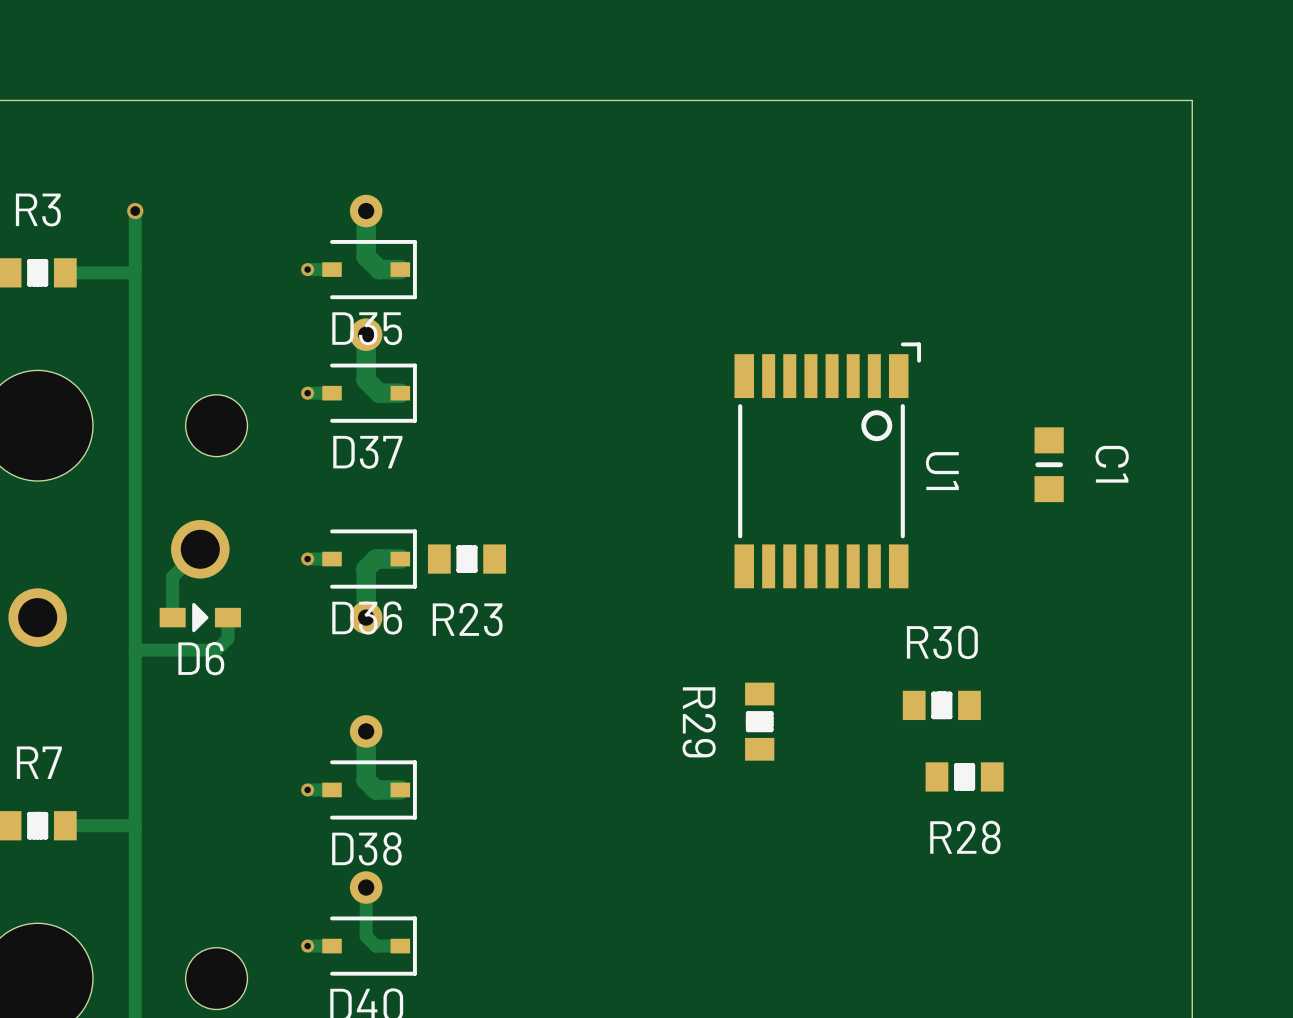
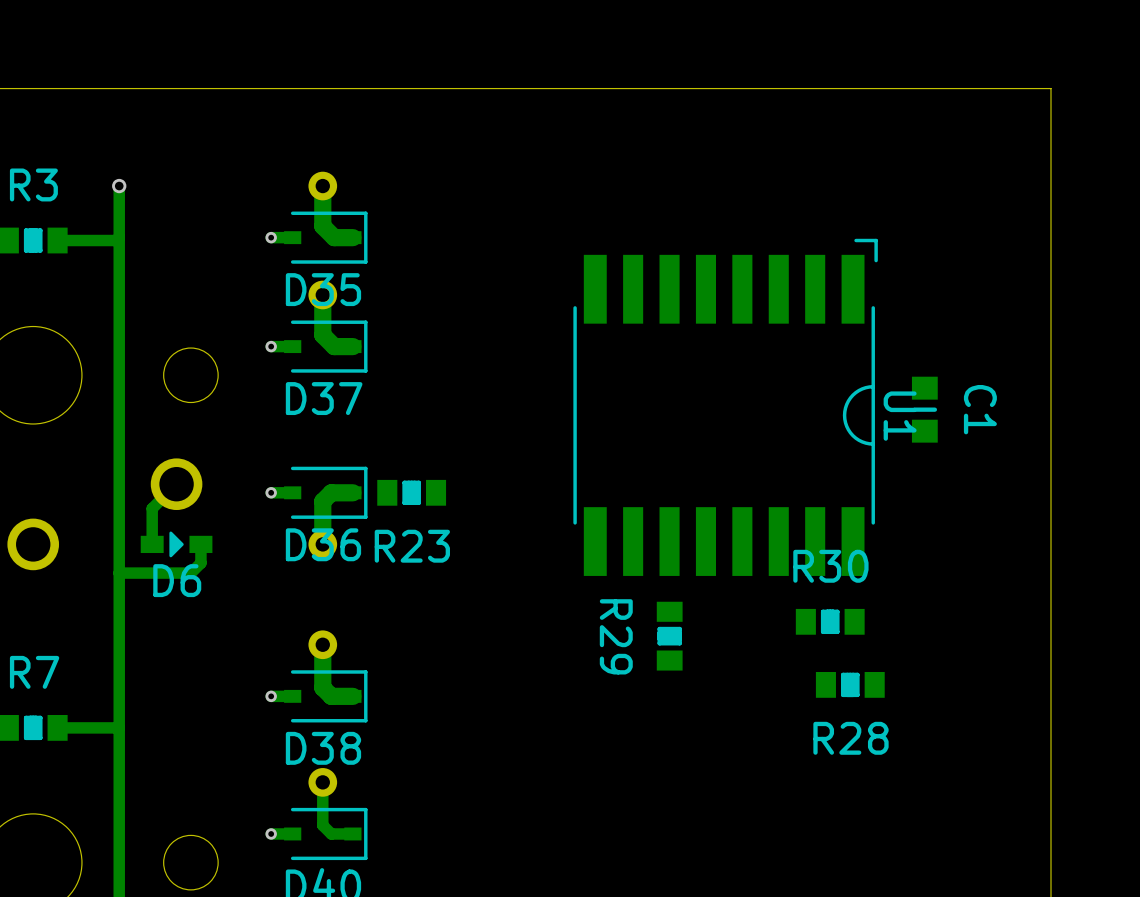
U1 footprint: [734, 342, 922, 589] -> [573, 238, 878, 576]
U1 name position: U1 (942, 471) -> U1 (900, 416)

